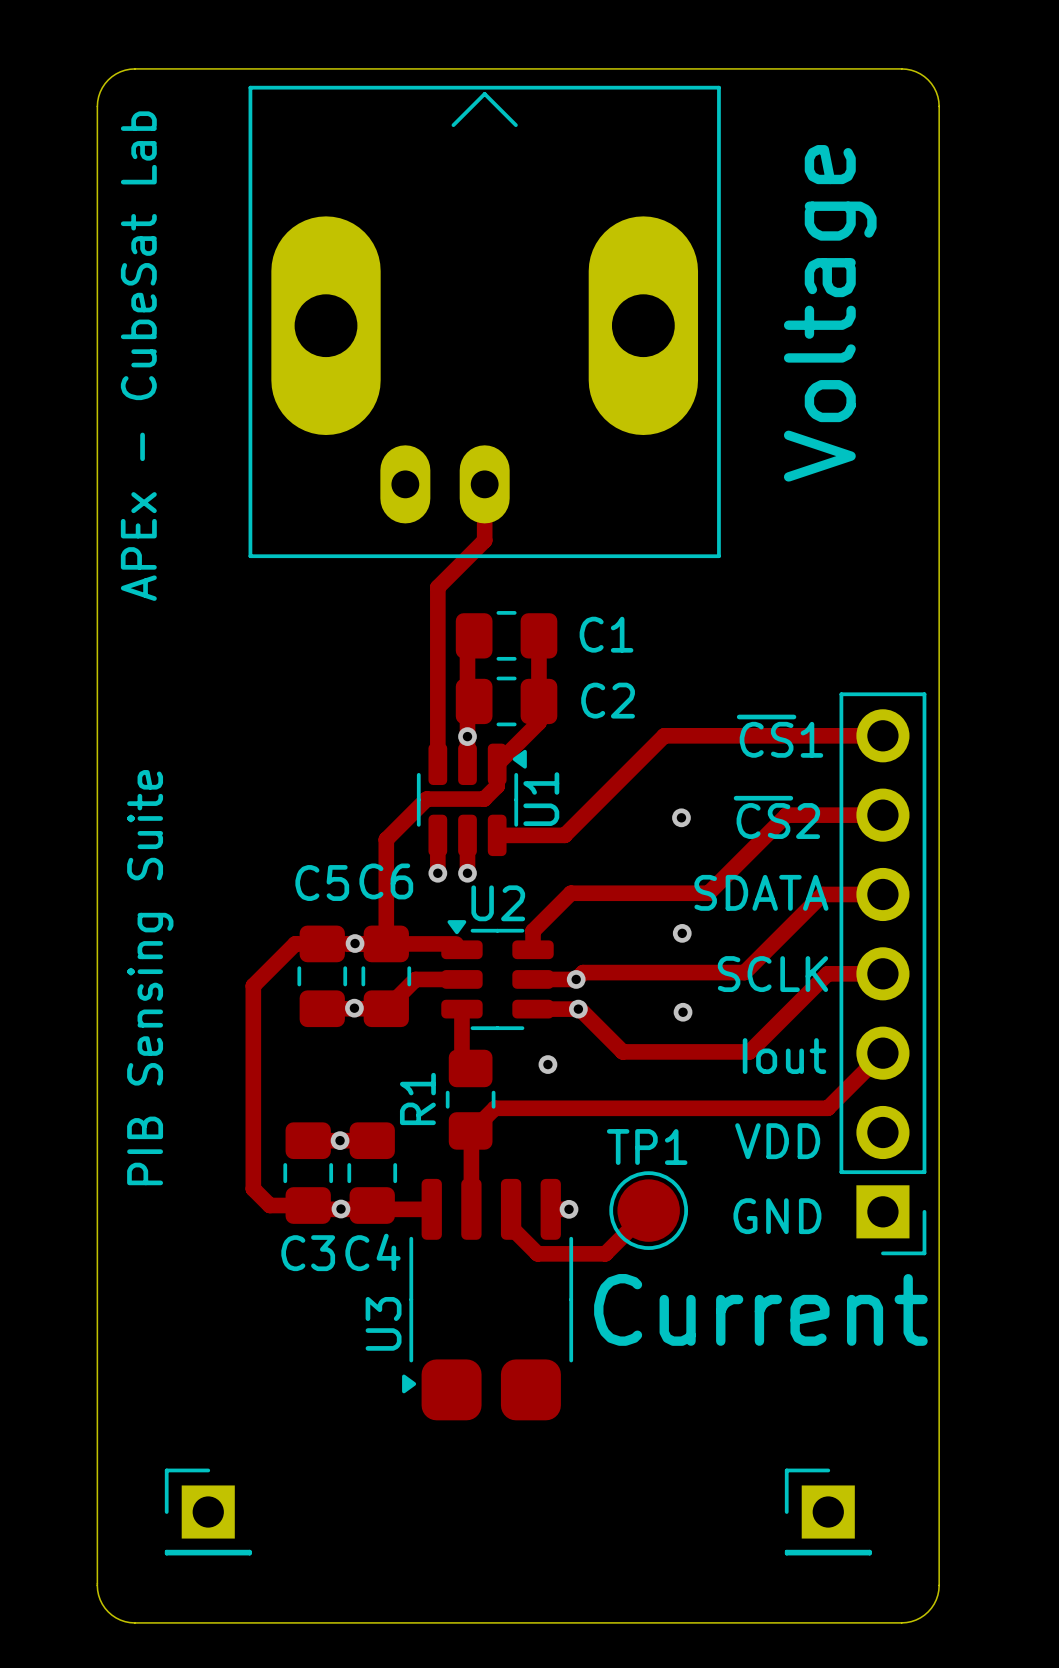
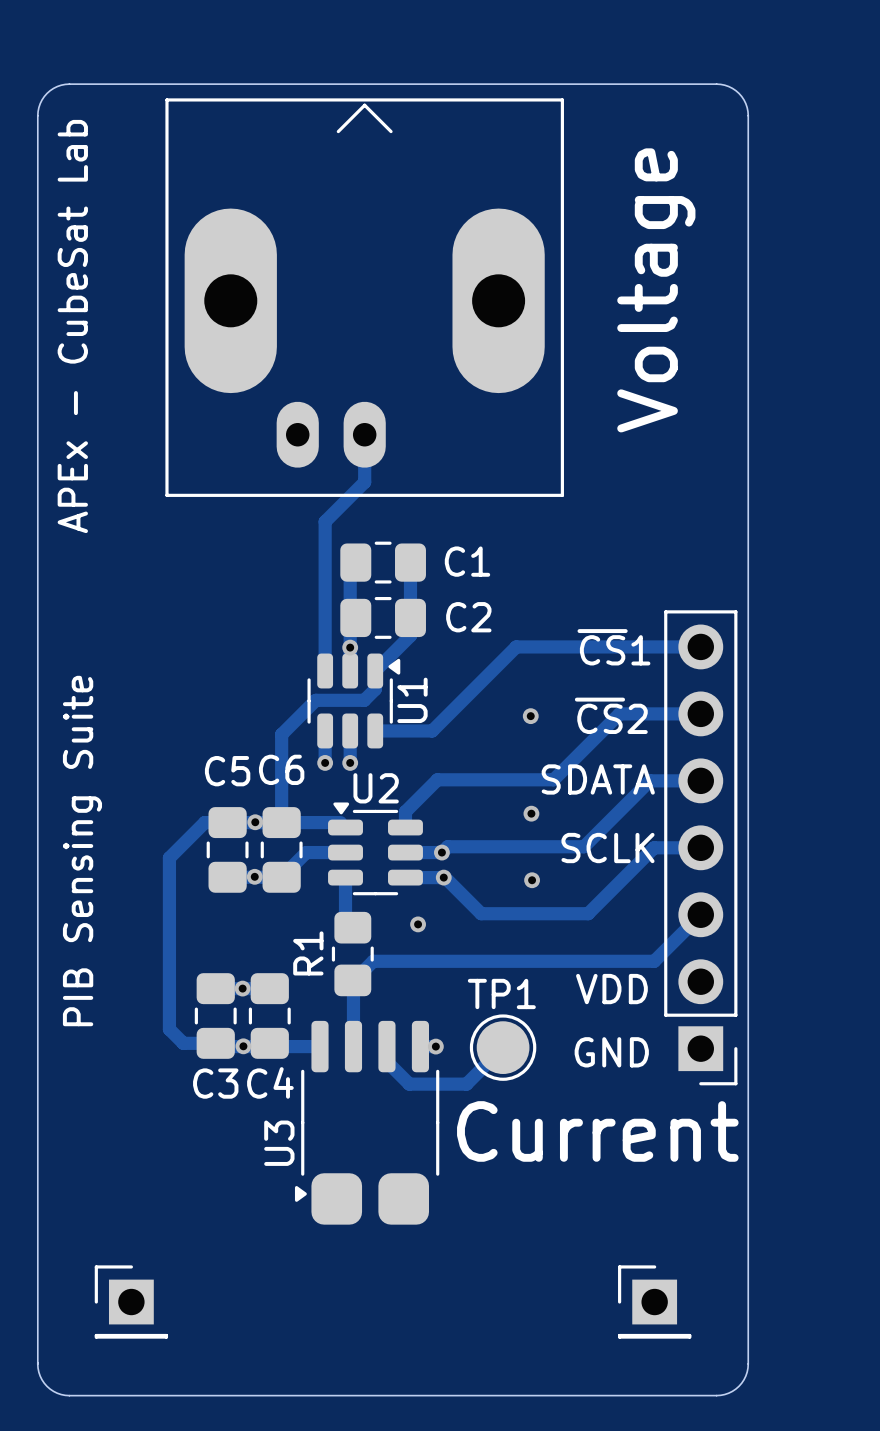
text: Iout (784, 1056) -> none

